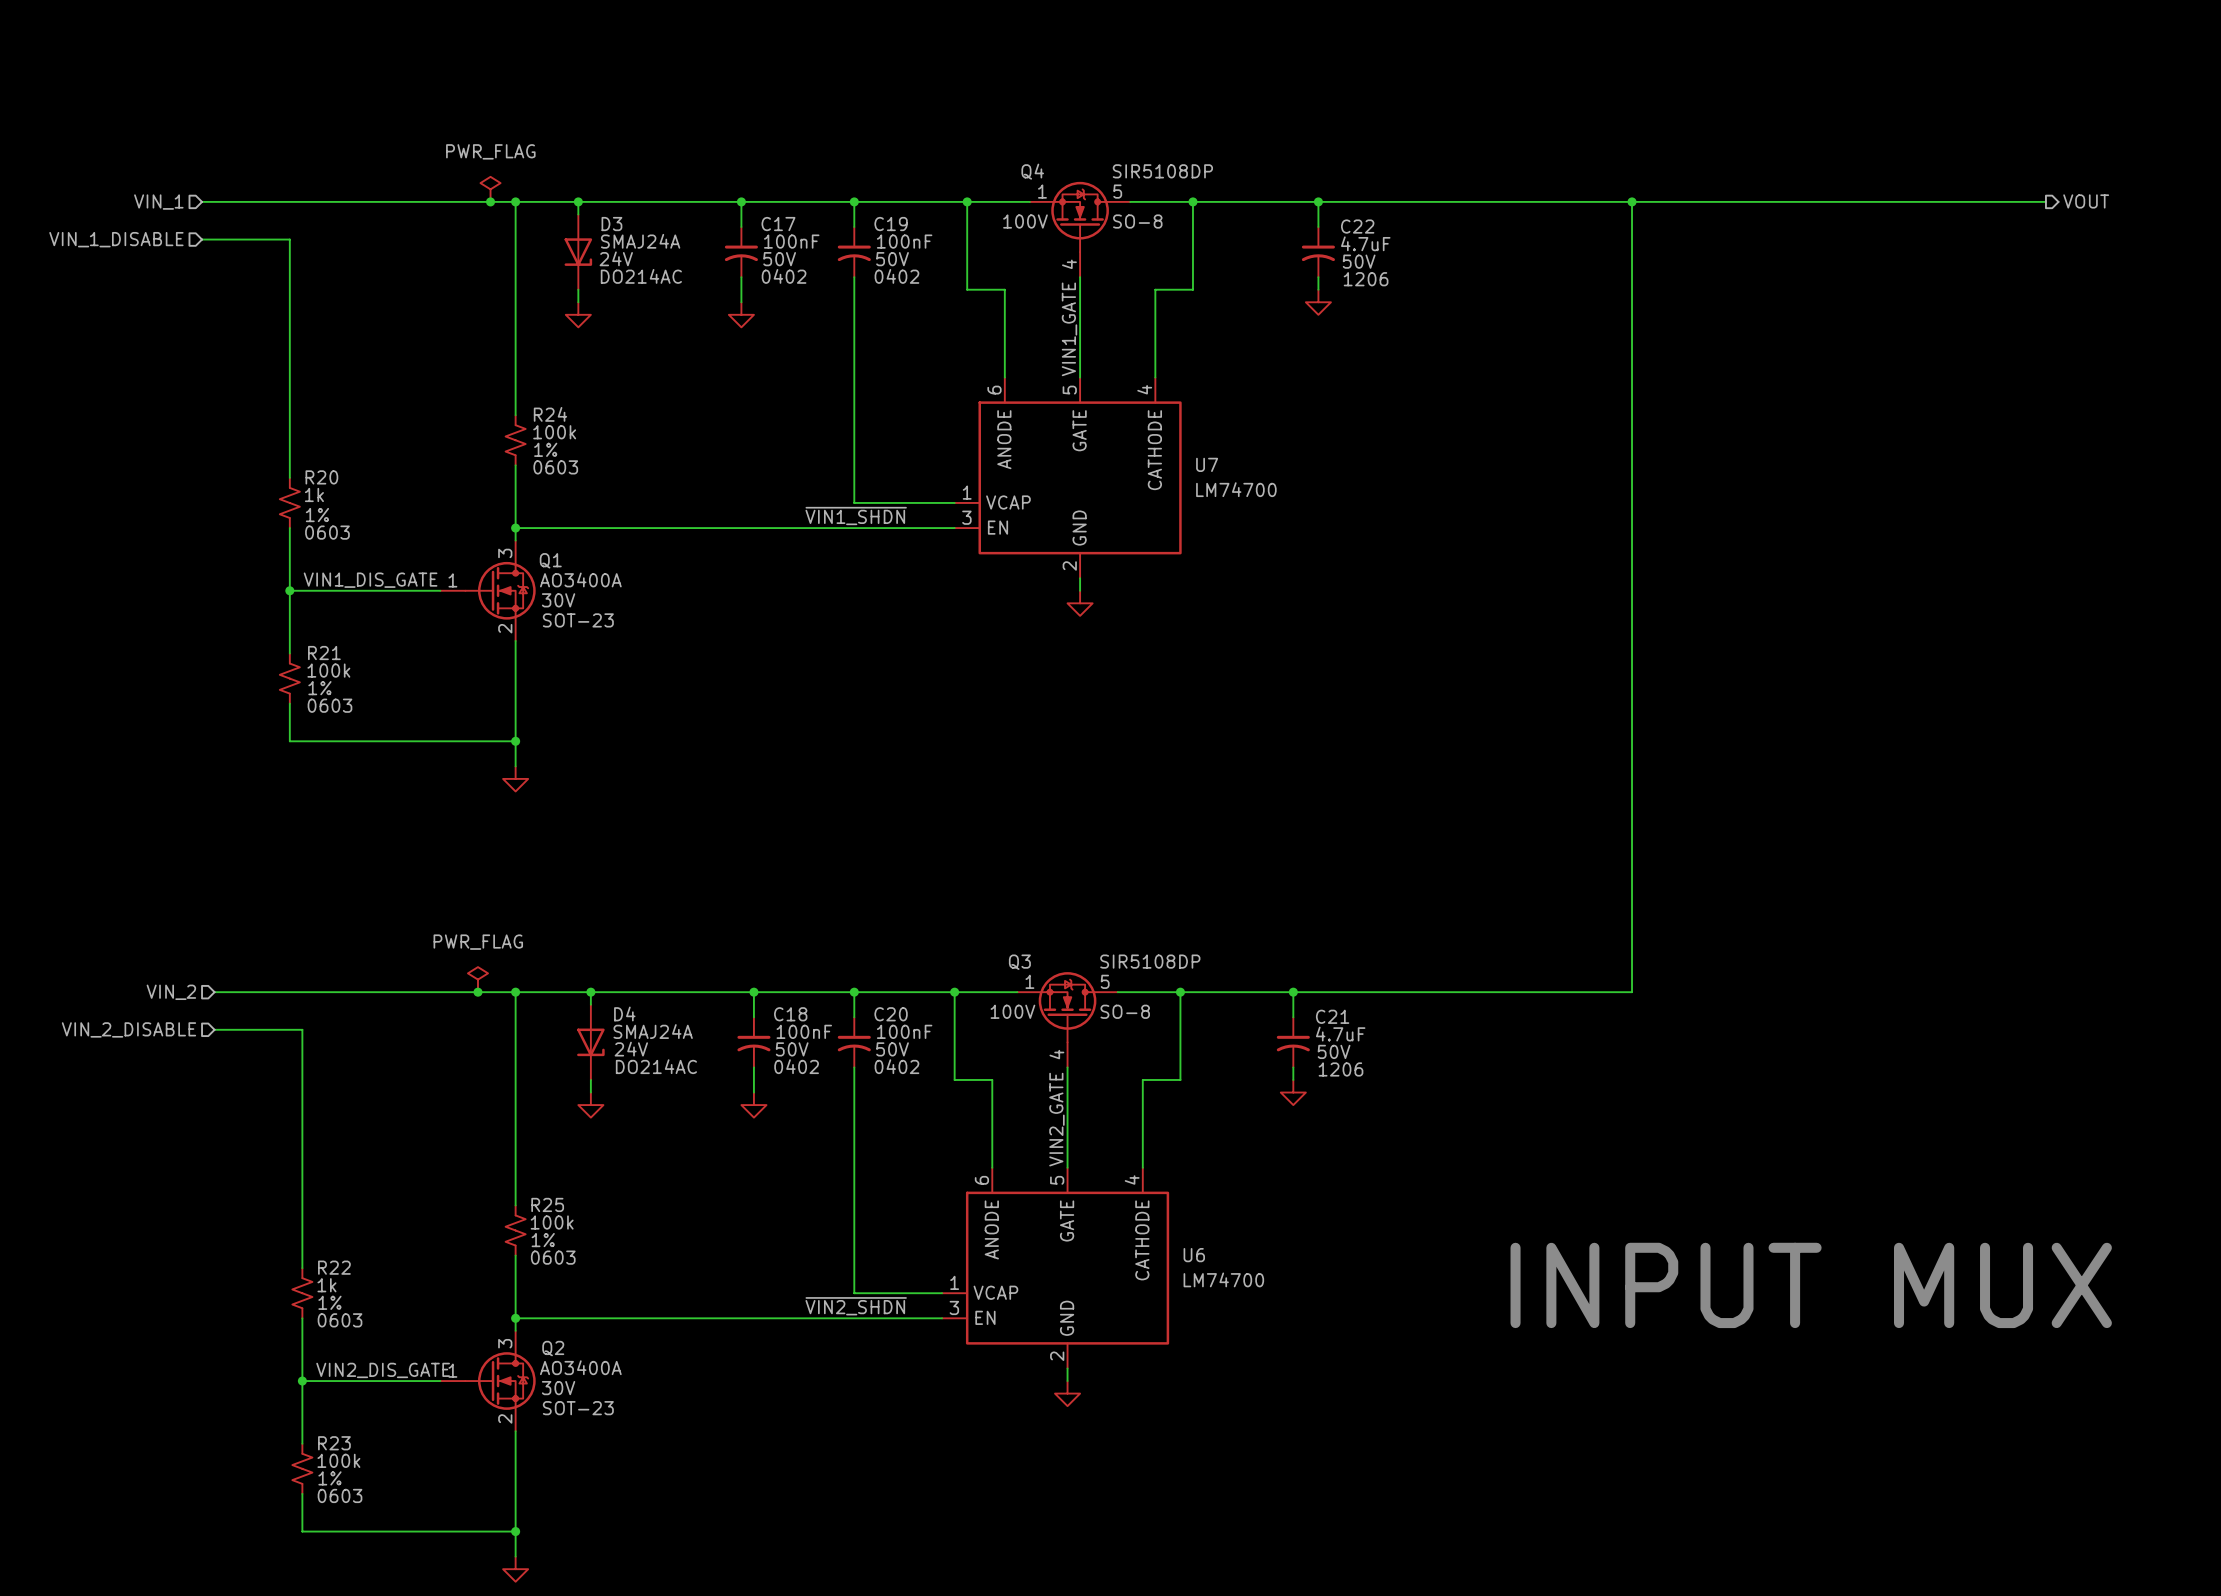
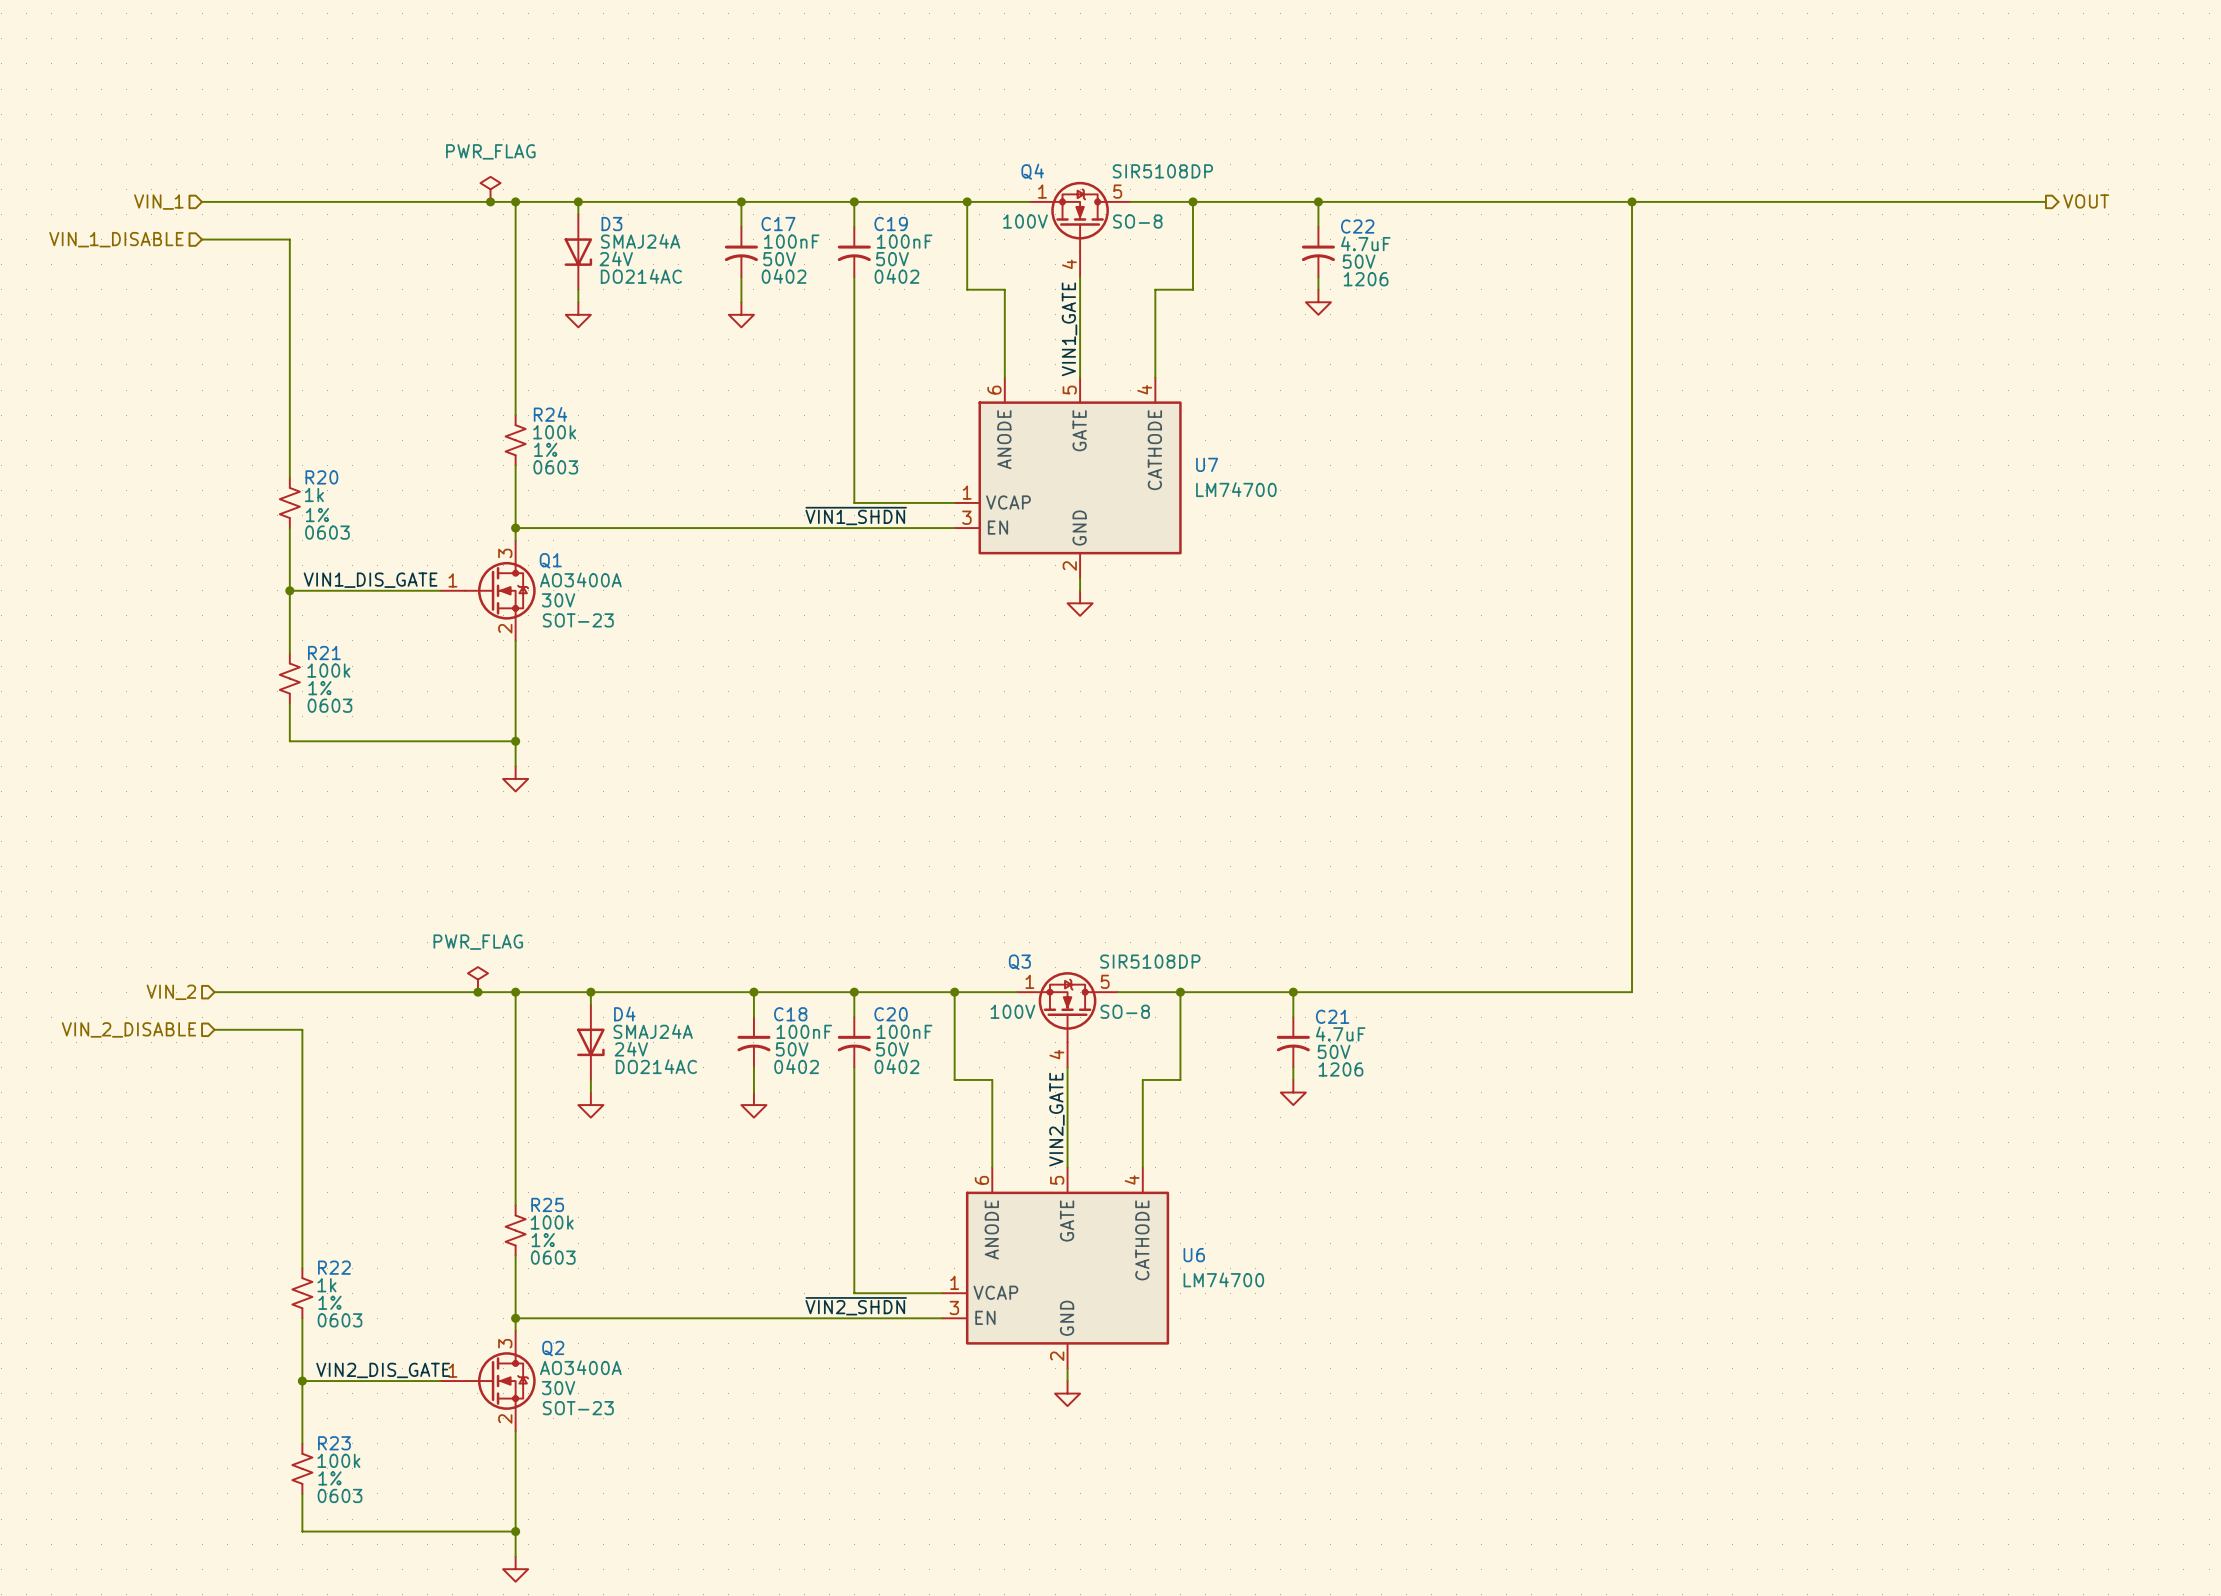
text: INPUT MUX (1811, 1285) -> none

